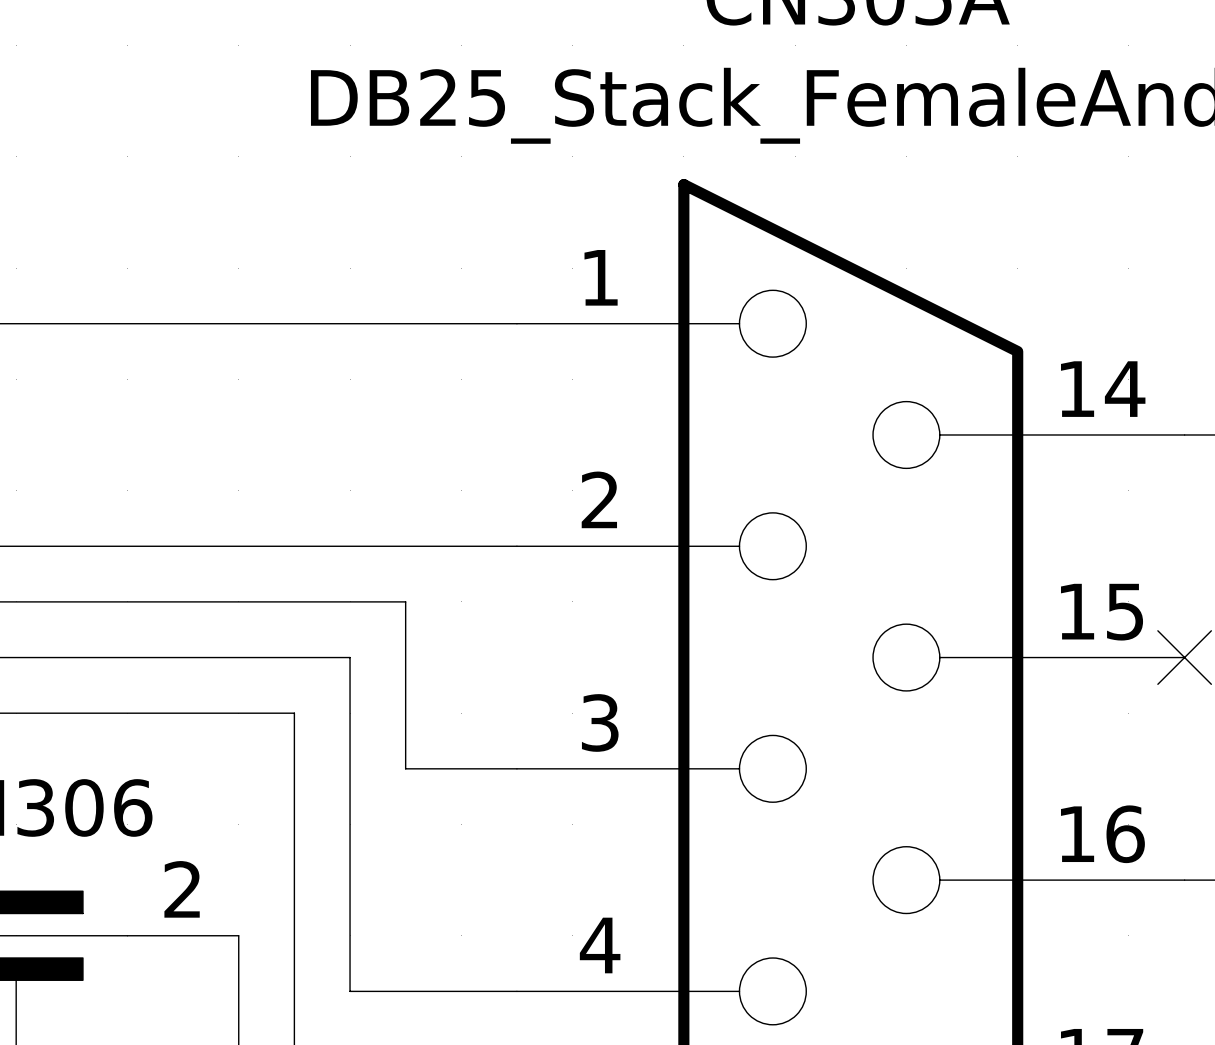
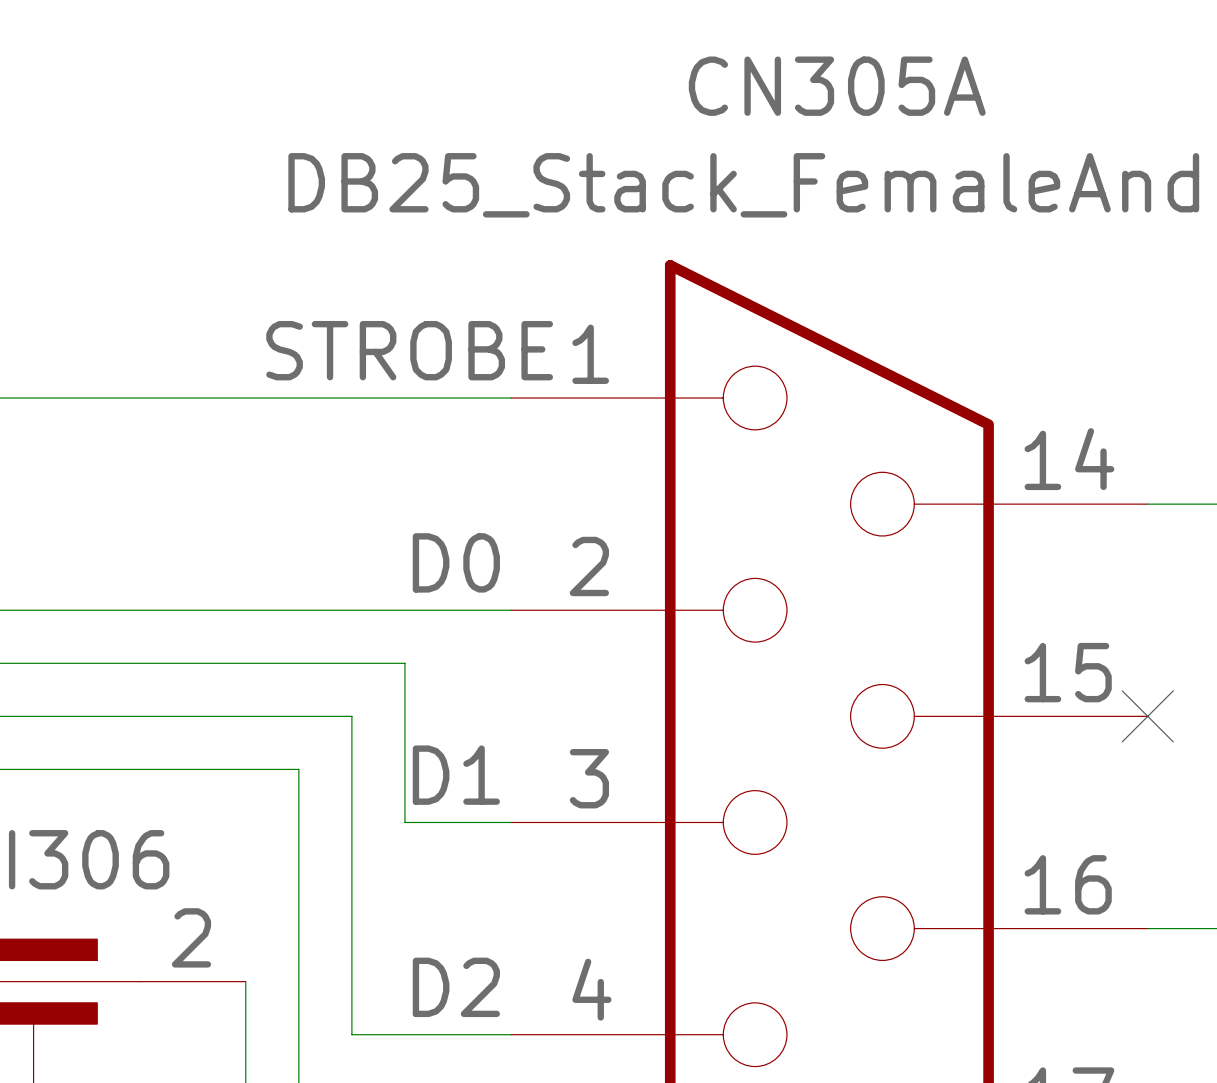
label: none -> STROBE (409, 350)
label: none -> D0 (456, 562)
label: none -> D1 (456, 775)
label: none -> D2 (456, 987)

